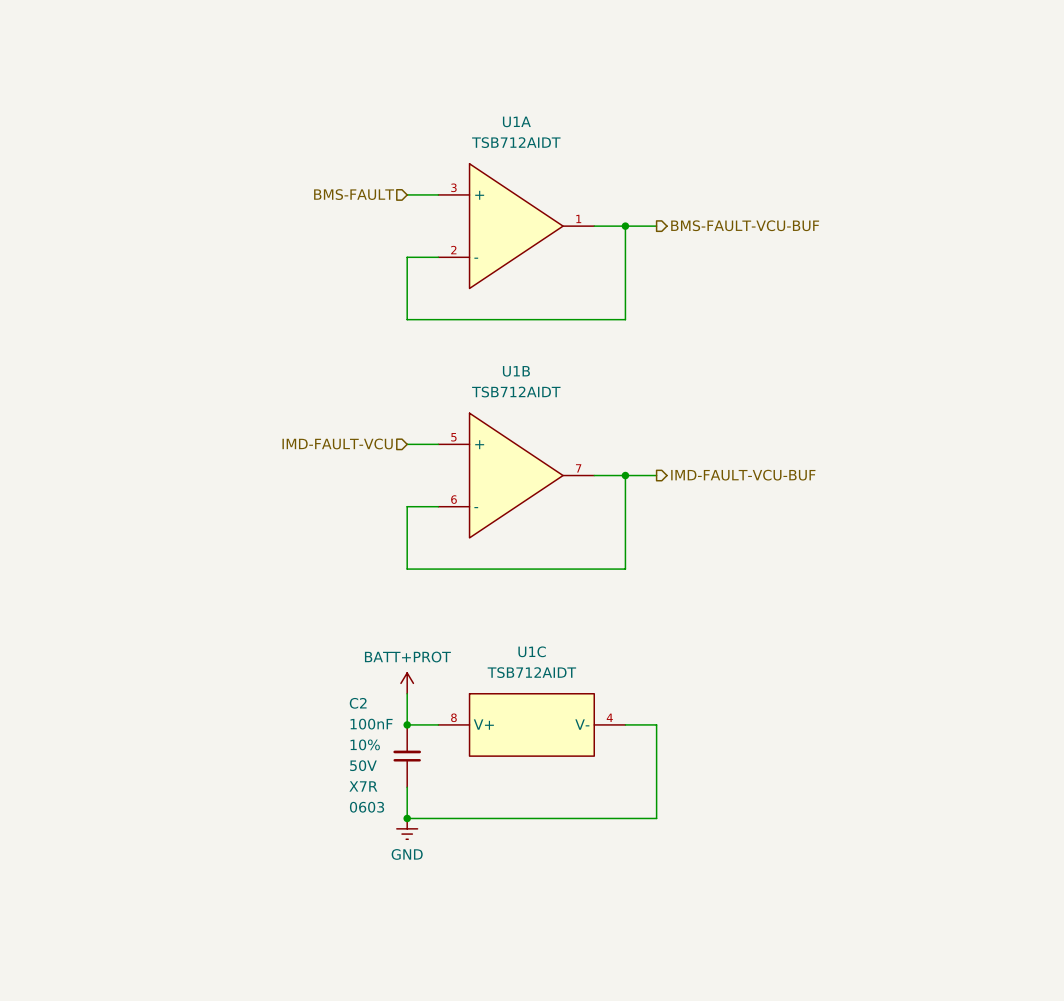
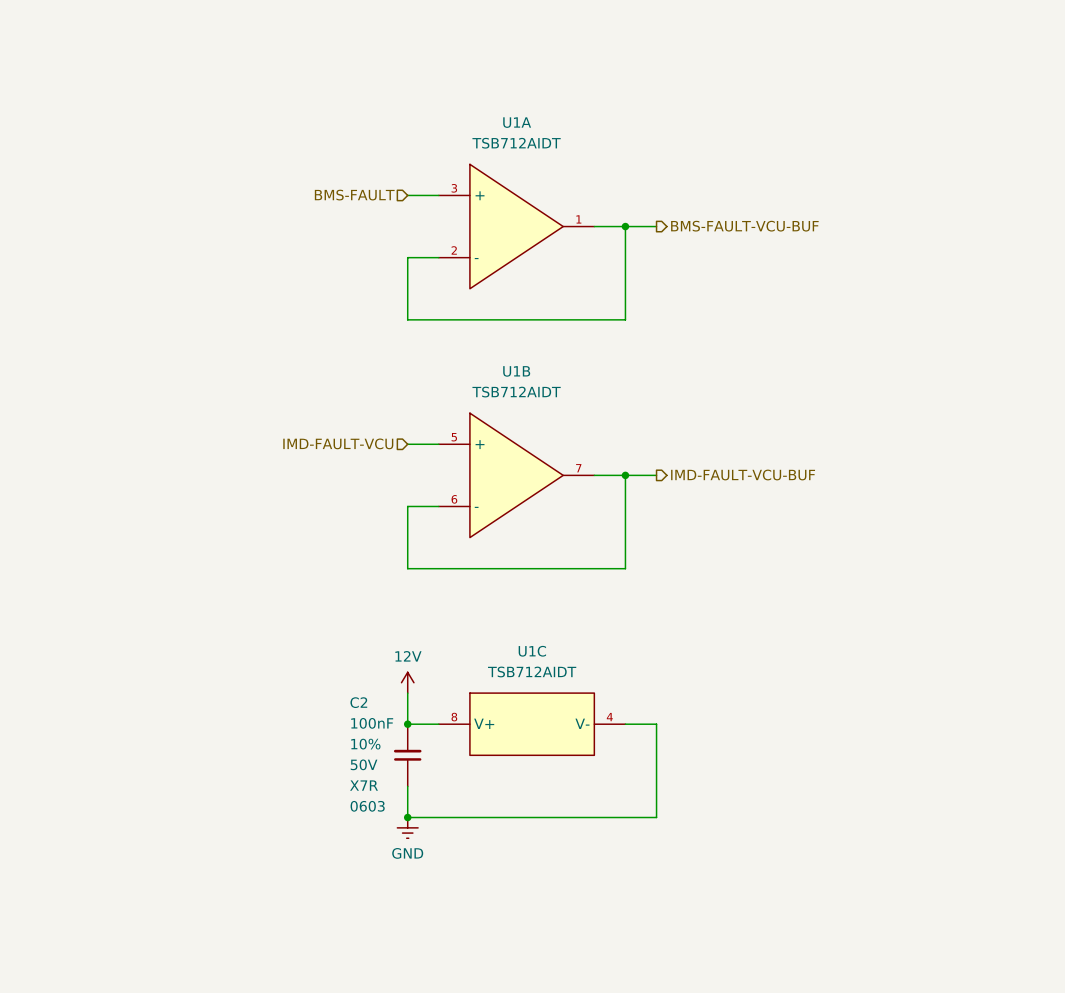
power symbol: BATT+PROT (407, 683) -> 12V (407, 682)

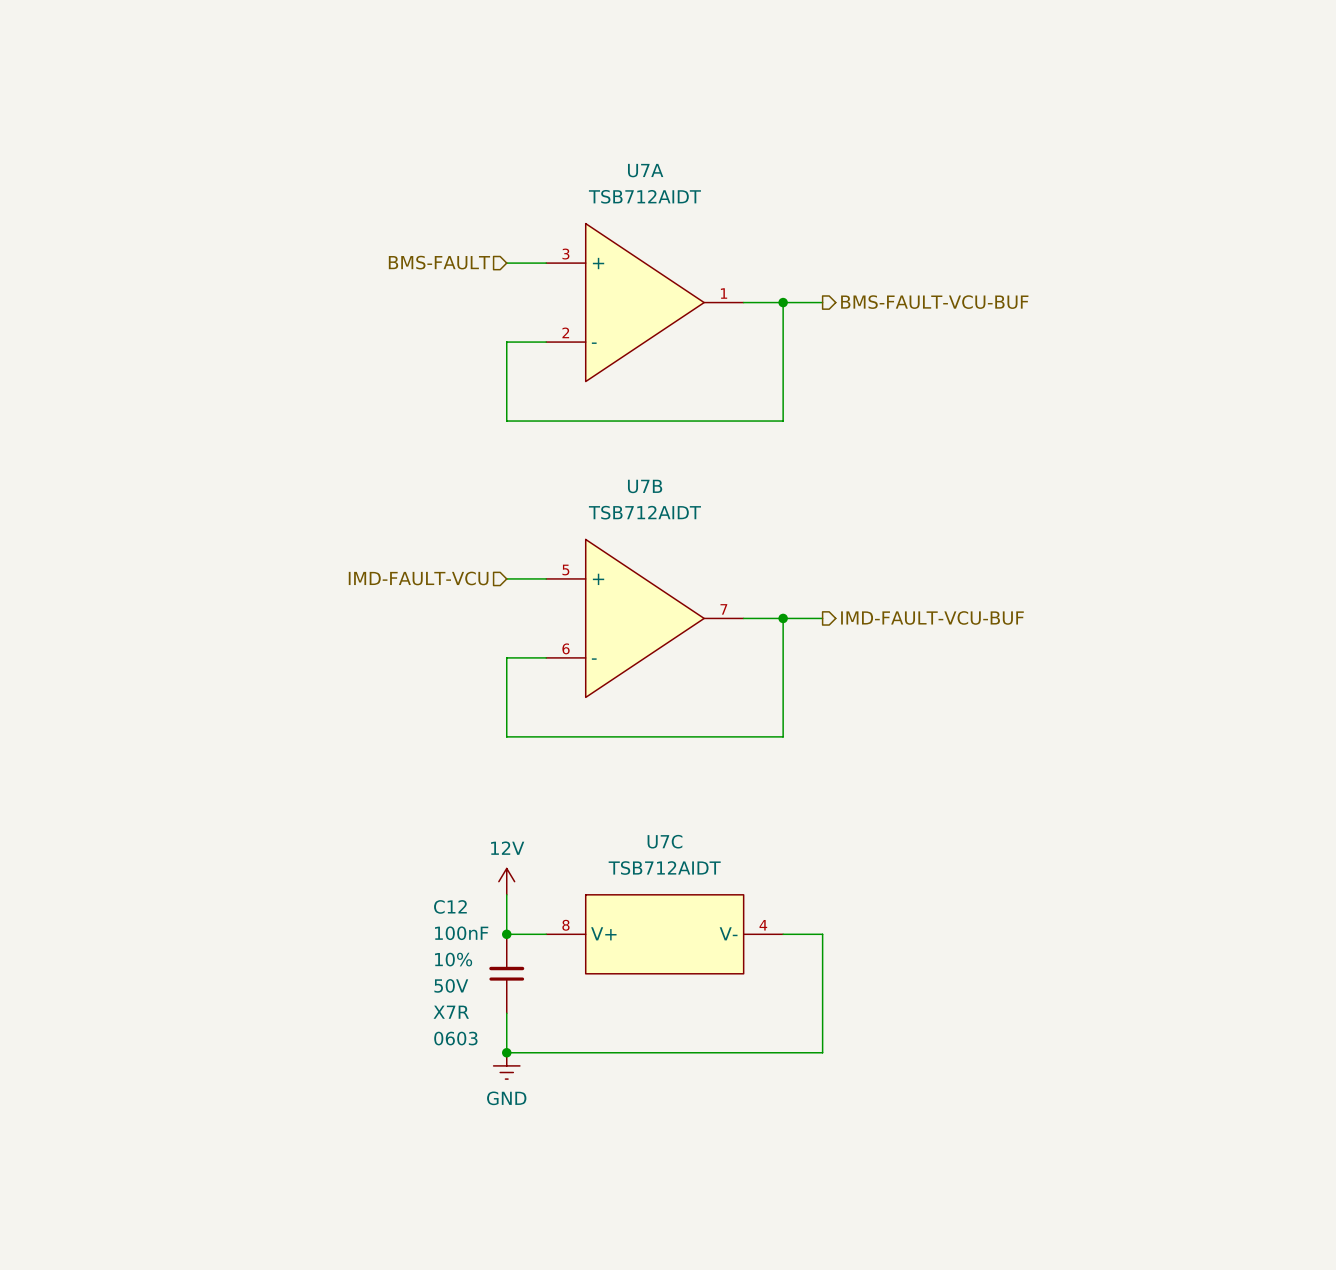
U1A name: U1A (517, 122) -> U7A (645, 170)
U1B name: U1B (516, 371) -> U7B (645, 486)
U1C name: U1C (532, 651) -> U7C (664, 841)
C2 name: C2 (358, 702) -> C12 (450, 906)

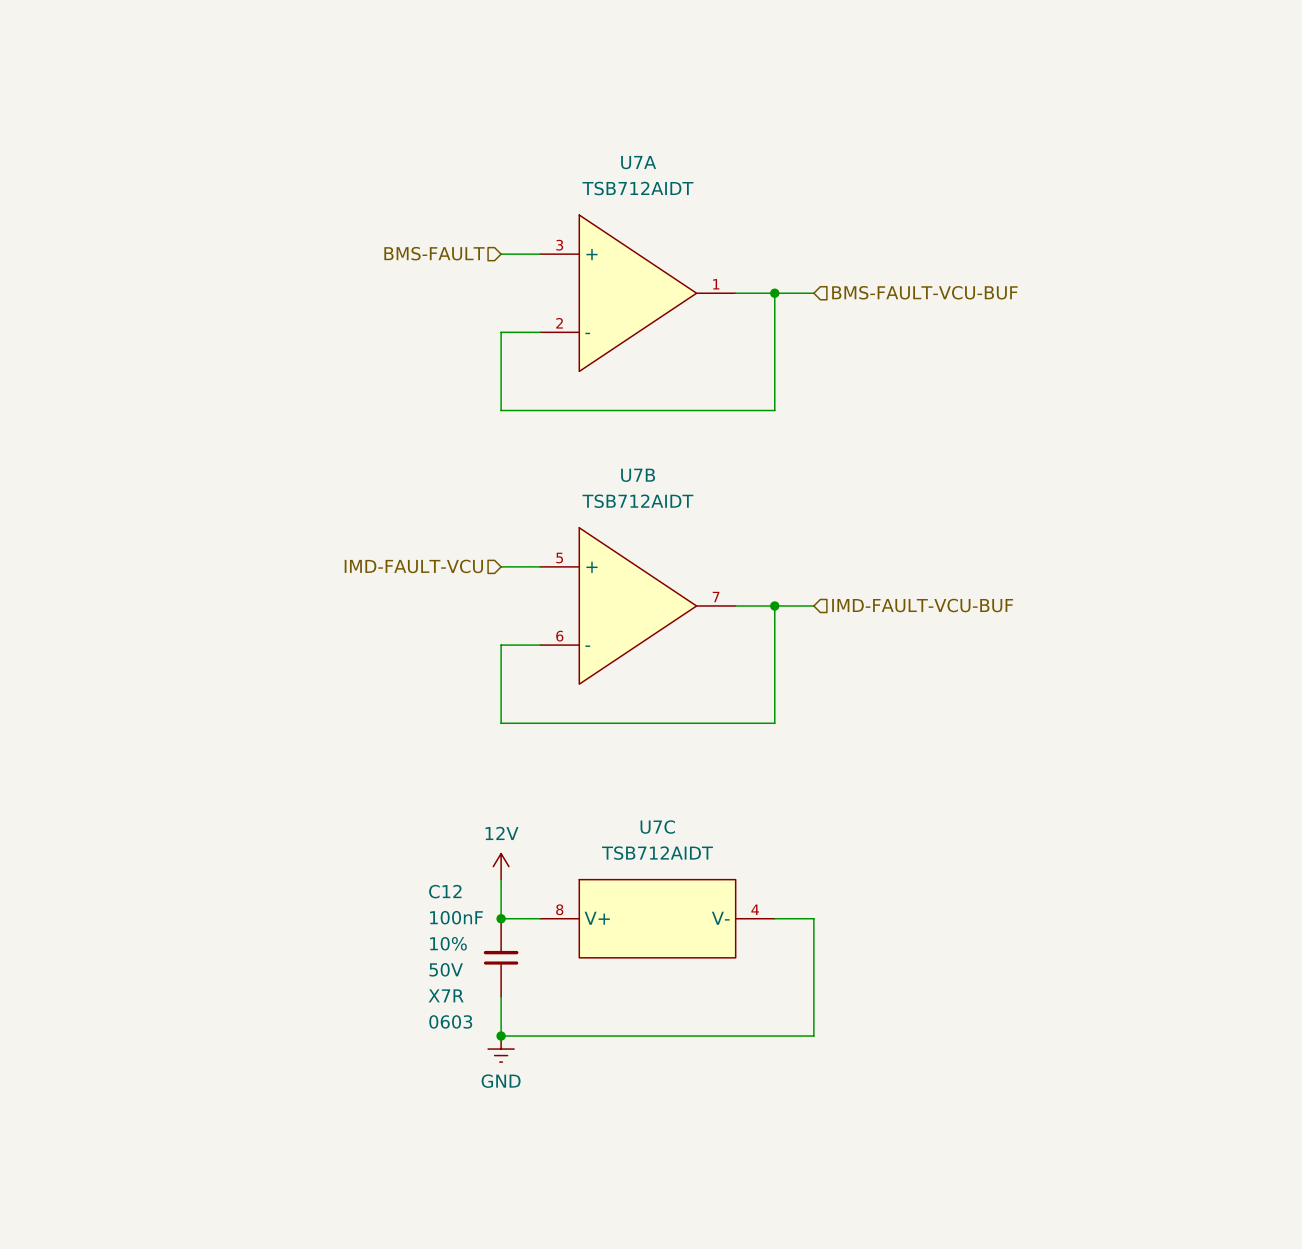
hierarchical label shape: output (934, 302) -> input (924, 292)
hierarchical label shape: output (932, 617) -> input (922, 605)

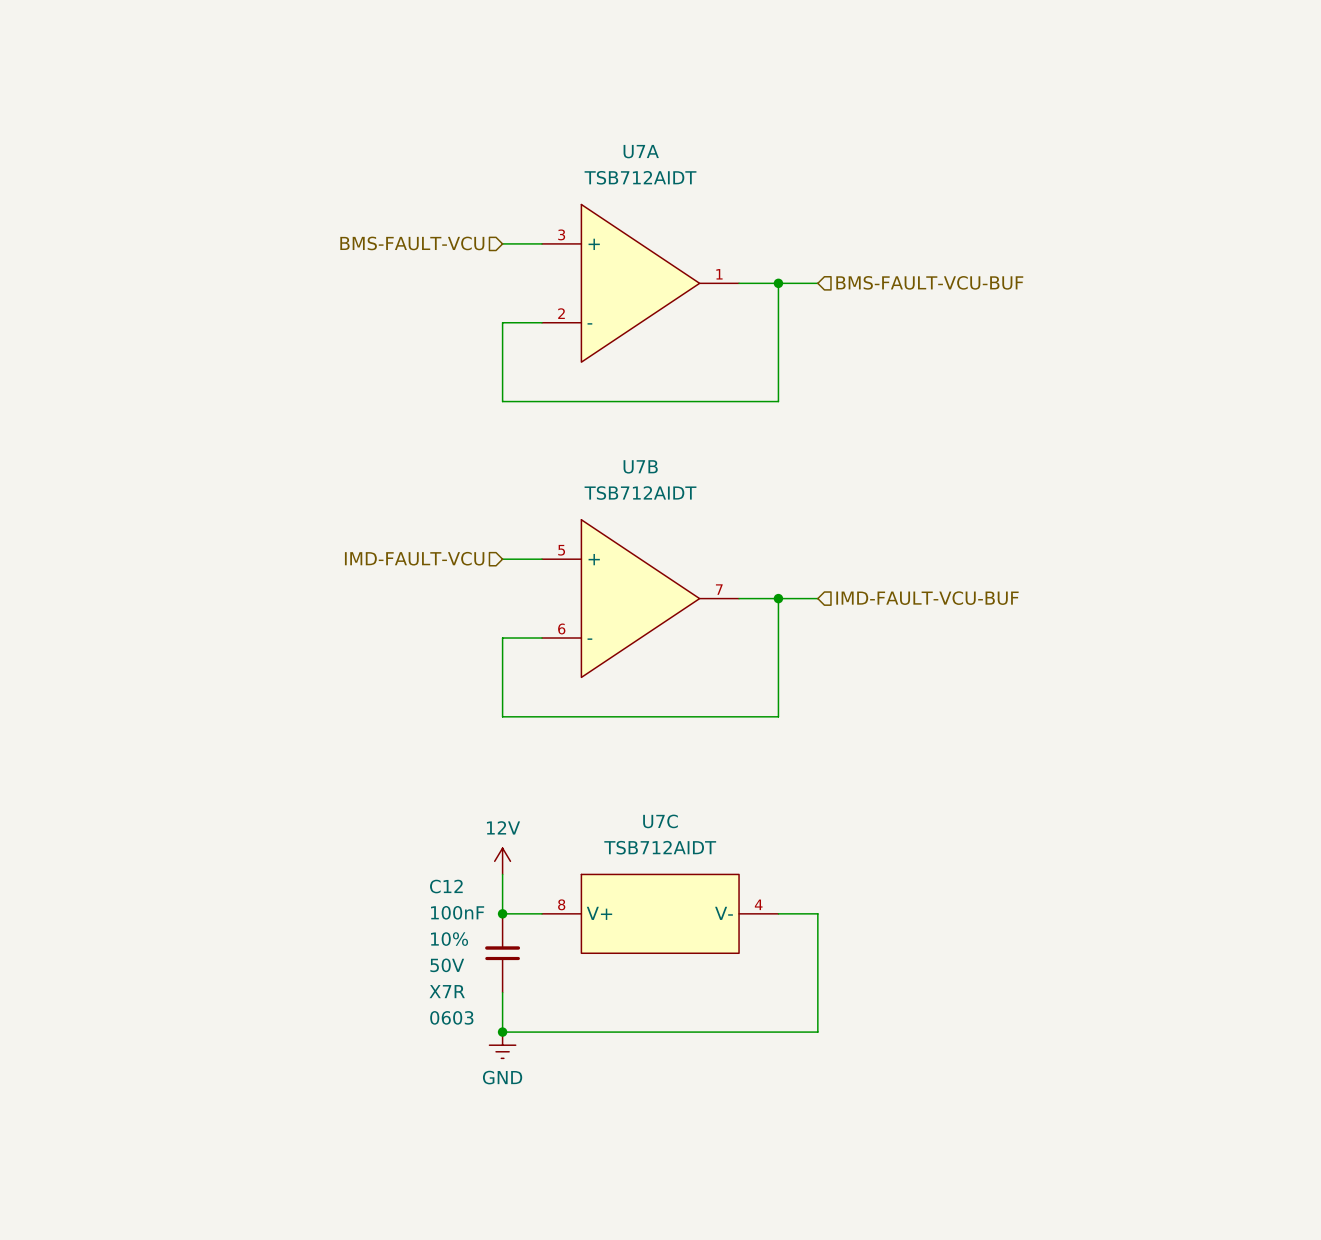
hierarchical label: BMS-FAULT (434, 253) -> BMS-FAULT-VCU (412, 243)

